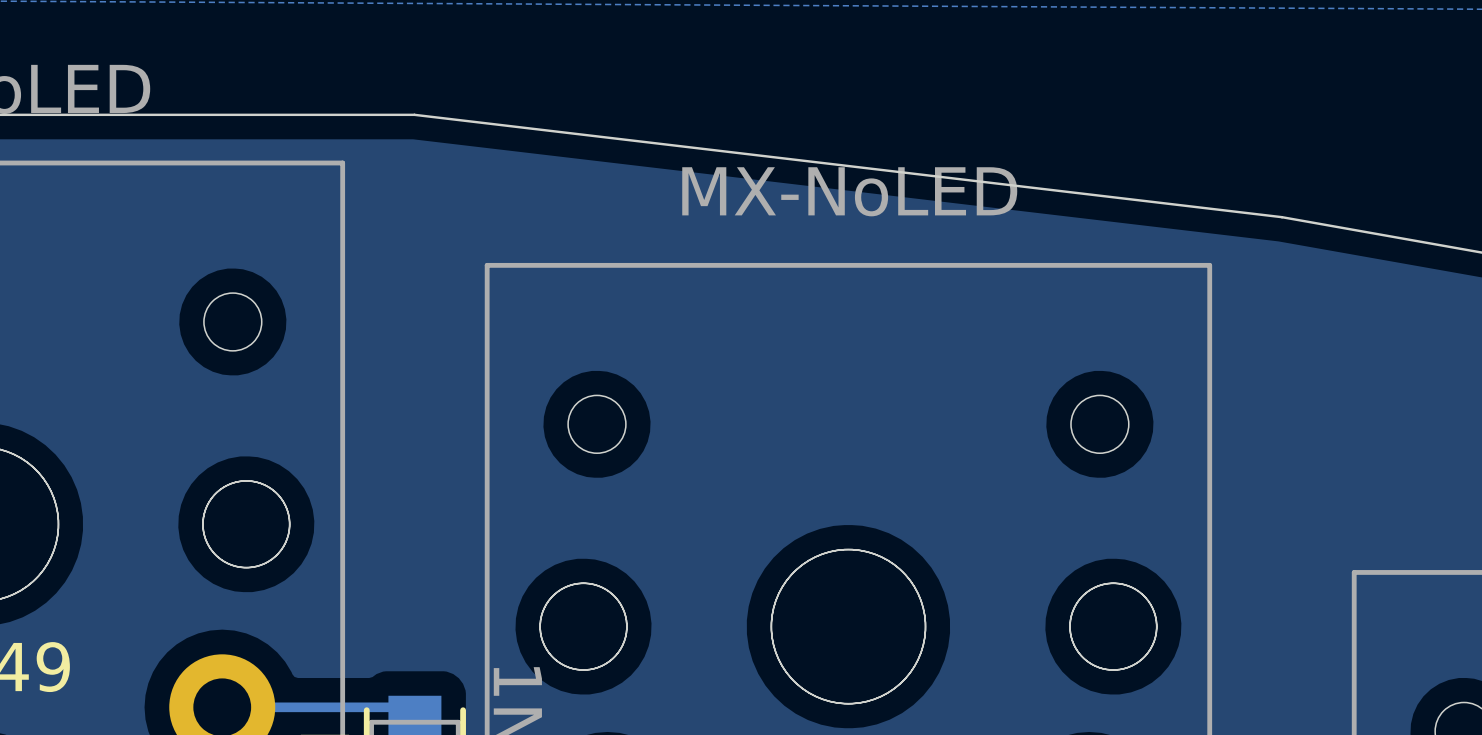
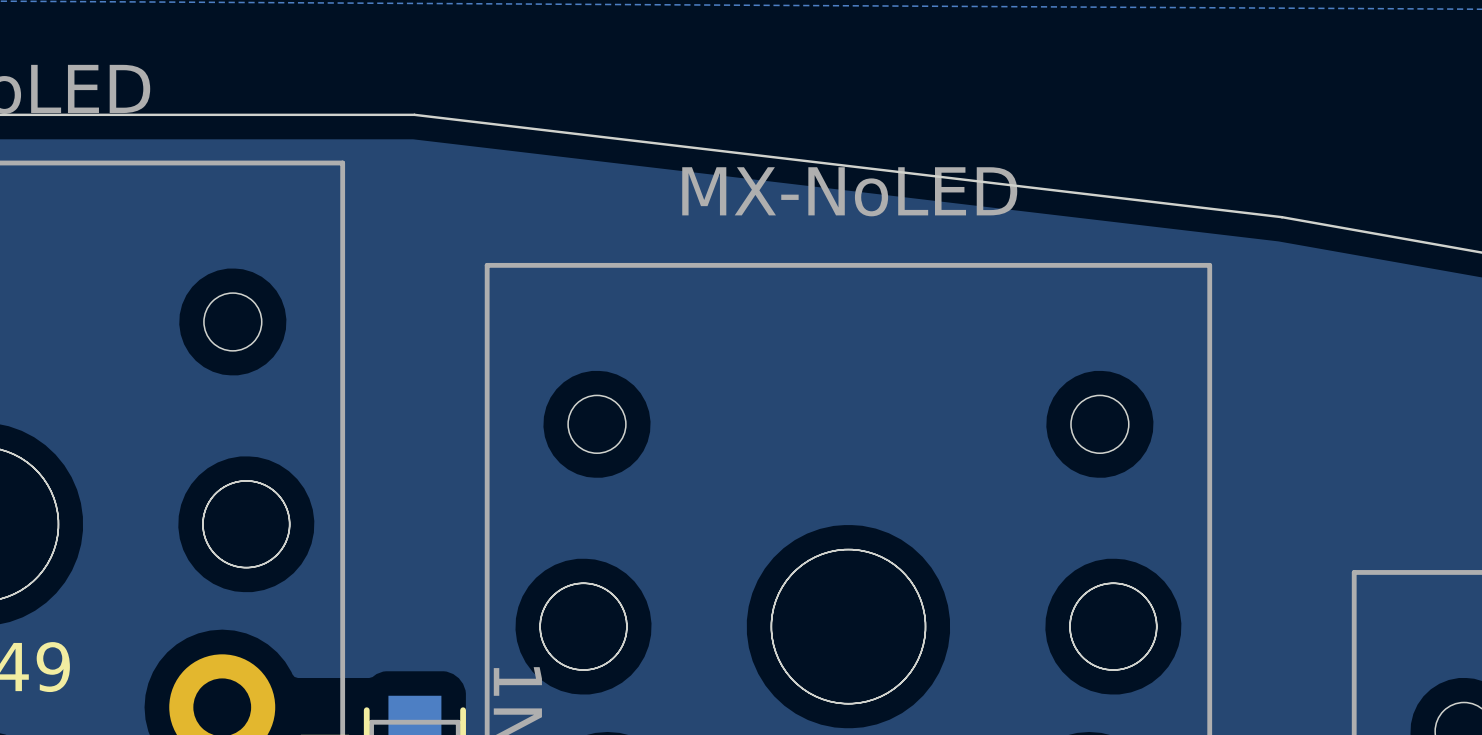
track: (222, 707) (399, 707) (414, 722) -> none

